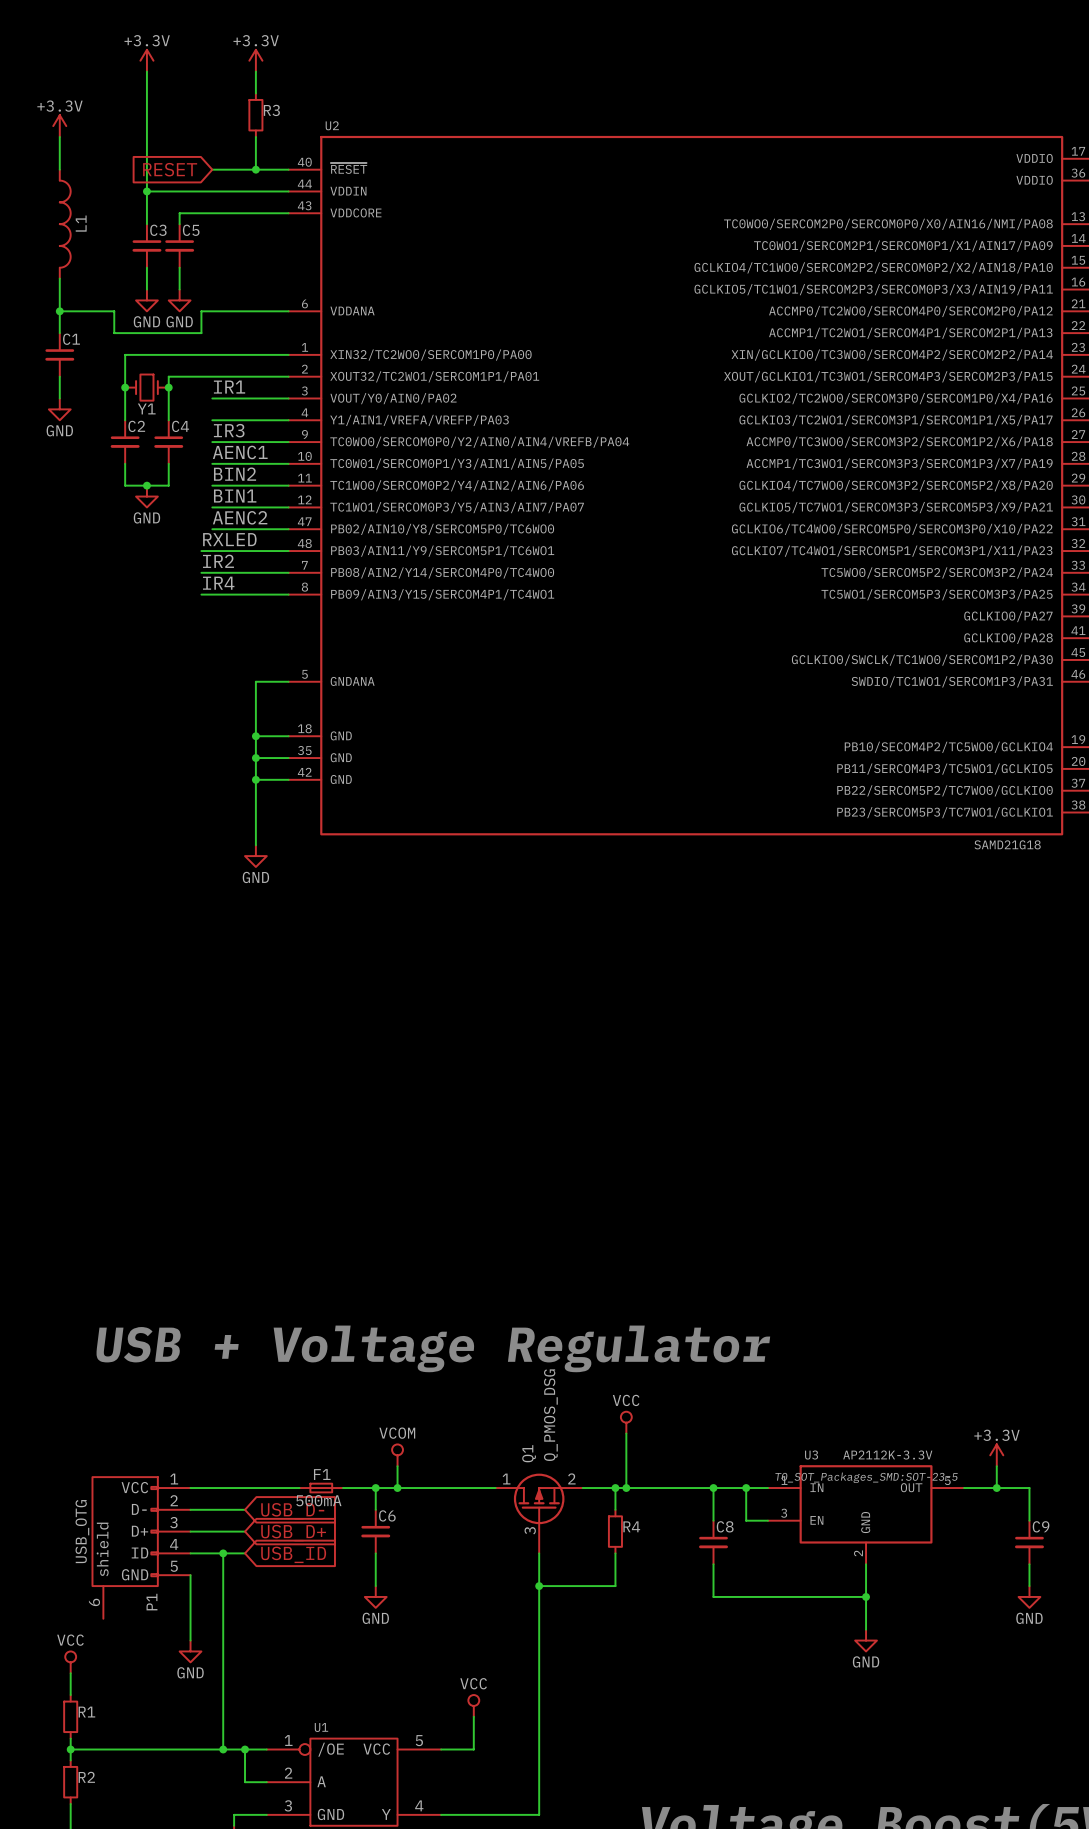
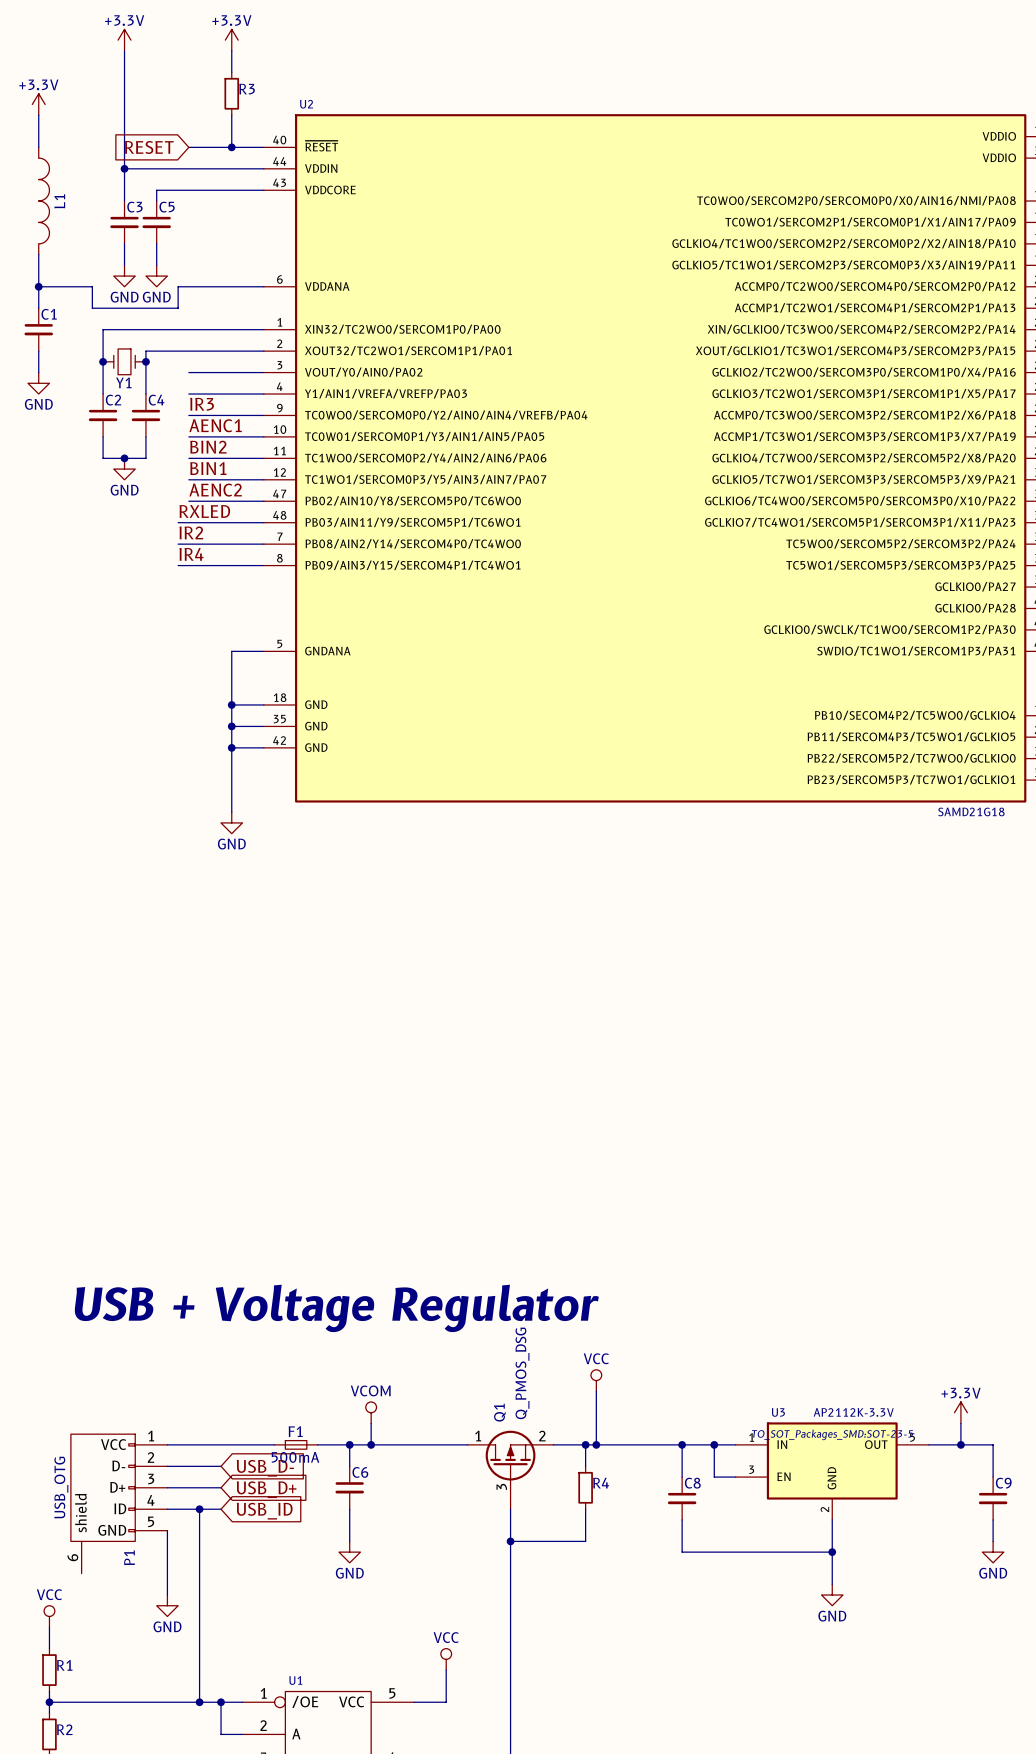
label: IR1 (229, 387) -> none

